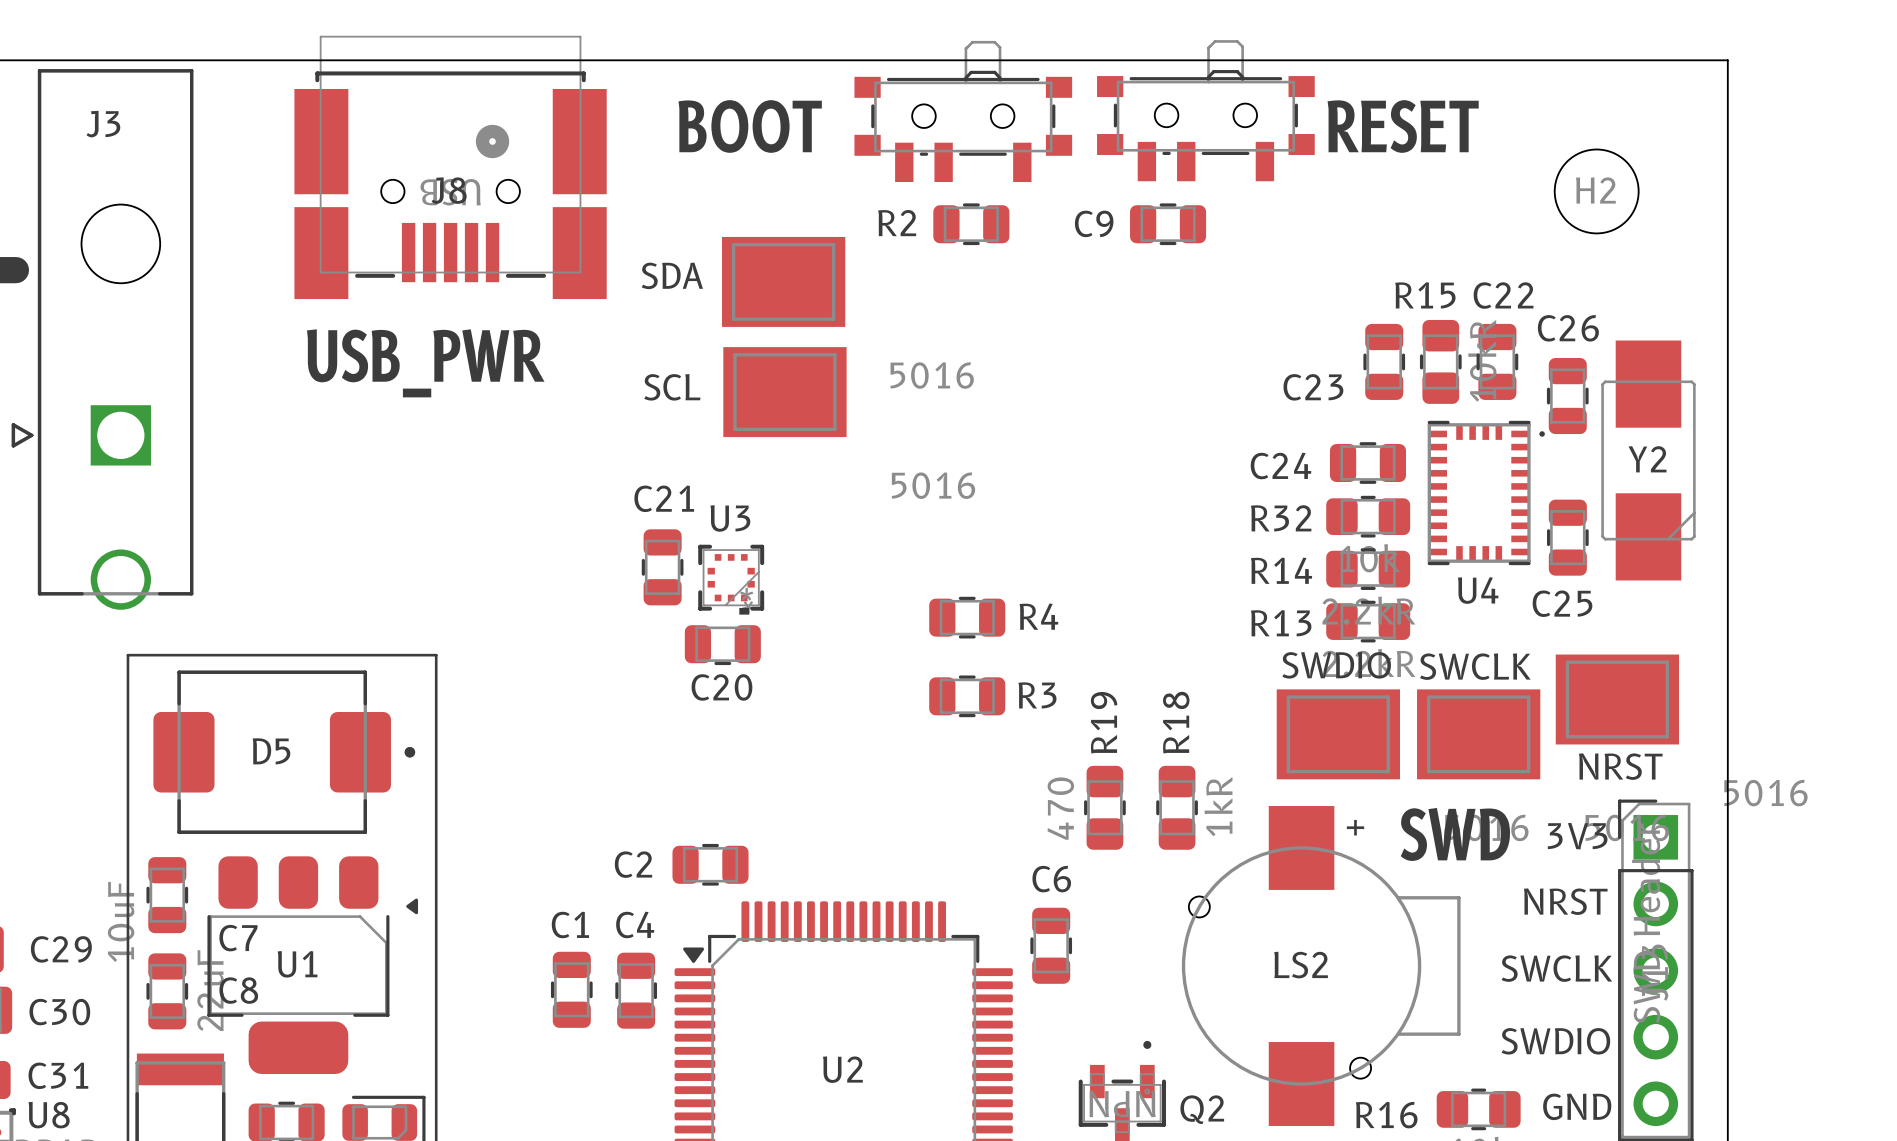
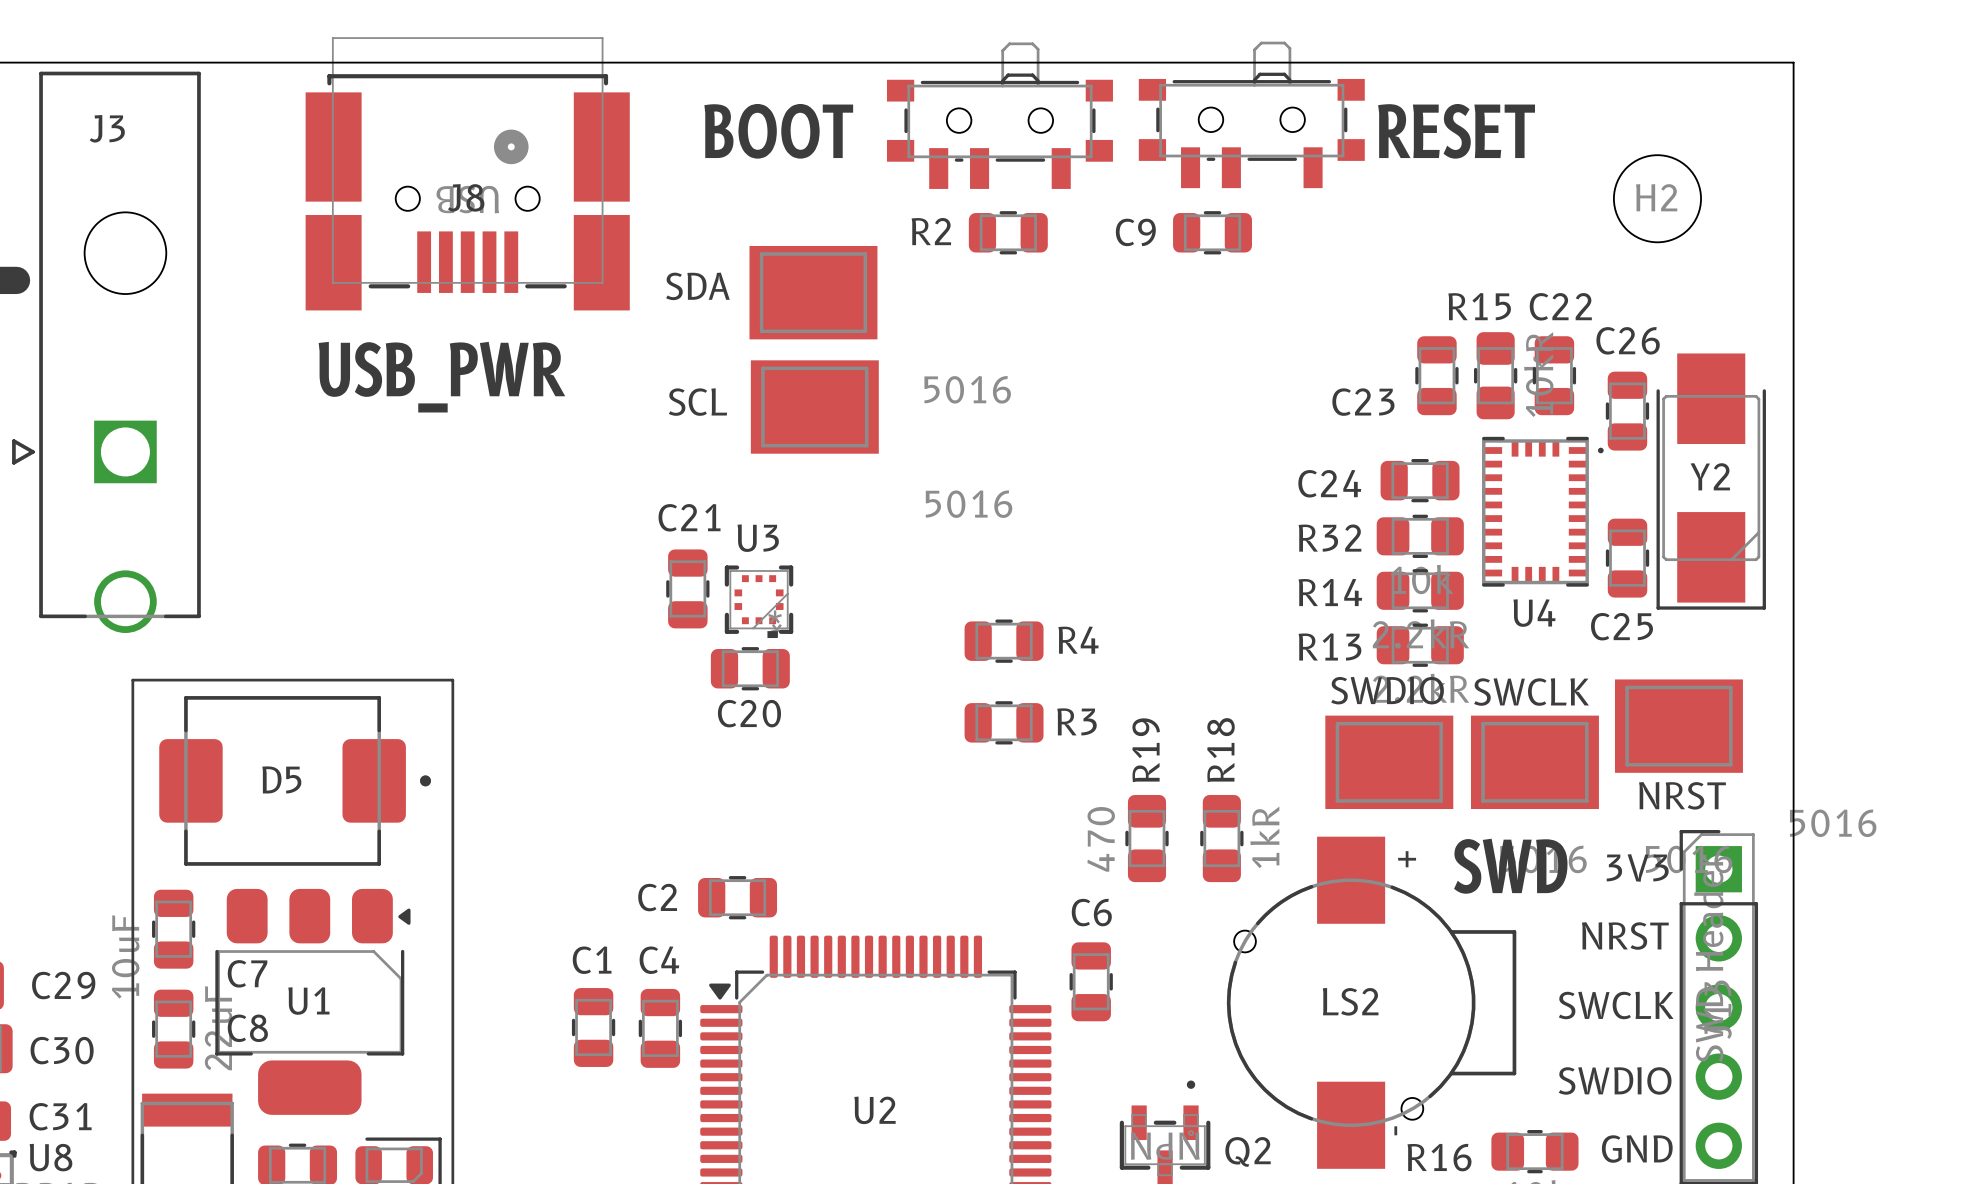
Y2 footprint: [1601, 340, 1696, 581] -> [1656, 353, 1766, 610]
C20 footprint: [684, 625, 761, 666] -> [710, 647, 790, 691]
LS2 footprint: [1181, 805, 1461, 1126] -> [1226, 836, 1517, 1169]
U1 footprint: [207, 856, 419, 1074] -> [215, 888, 411, 1115]

